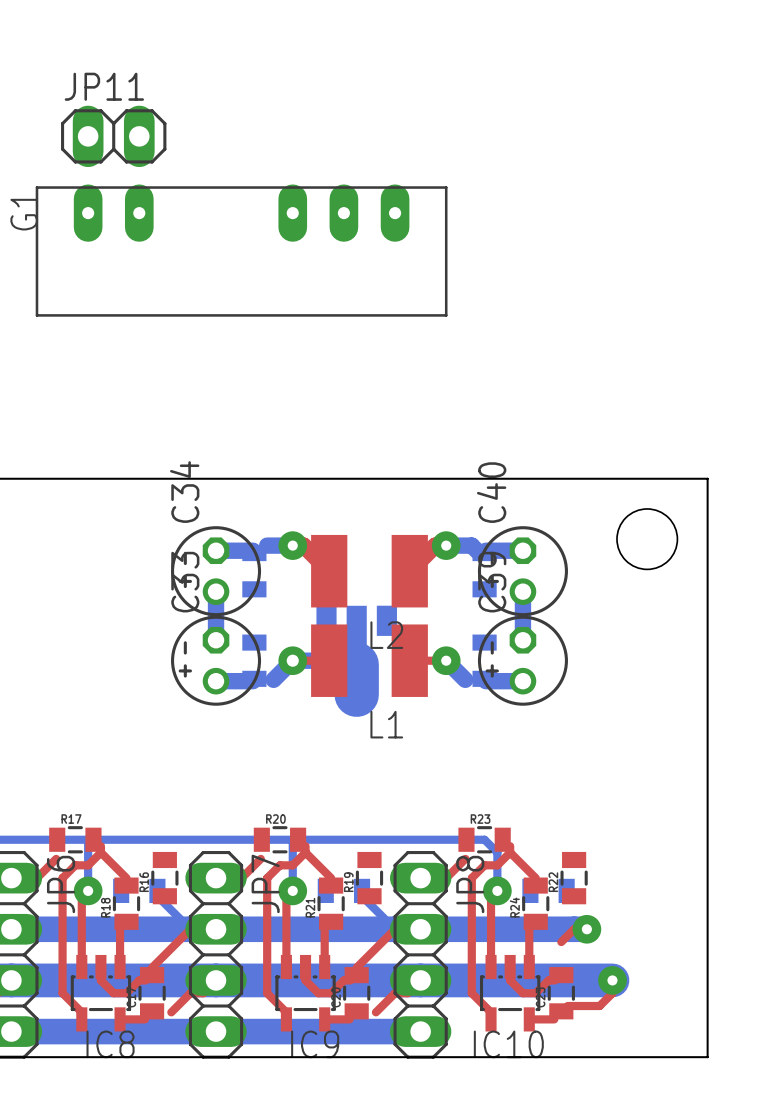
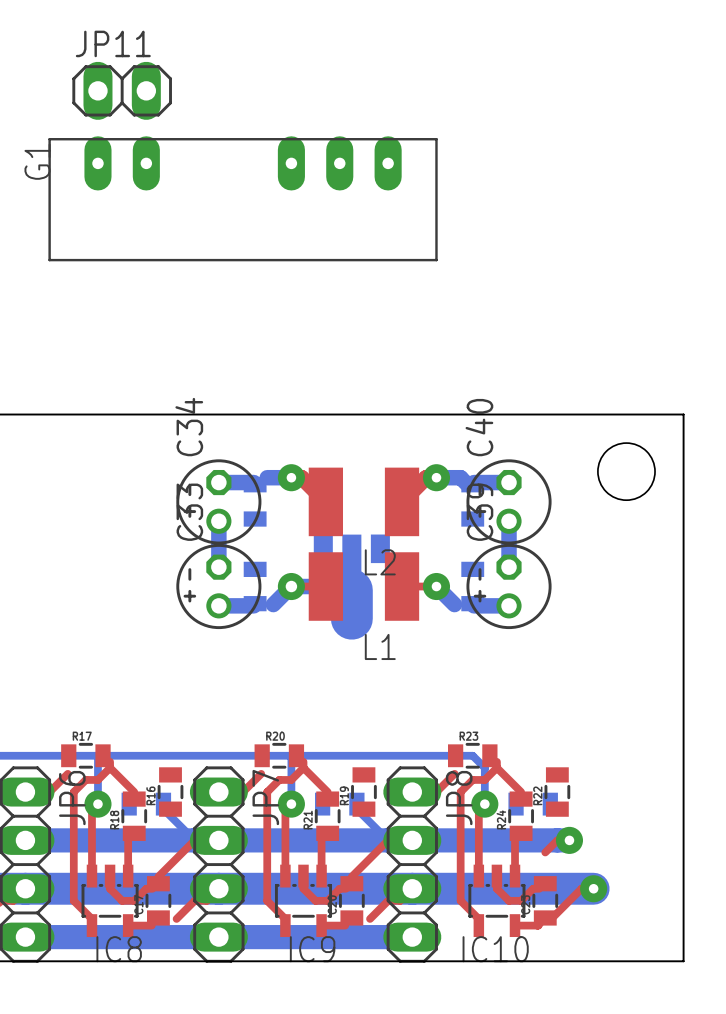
top track: (612, 980) (612, 993) (599, 1006) (567, 1006) -> (593, 888) (581, 888) (552, 917) (545, 917) (537, 925)

